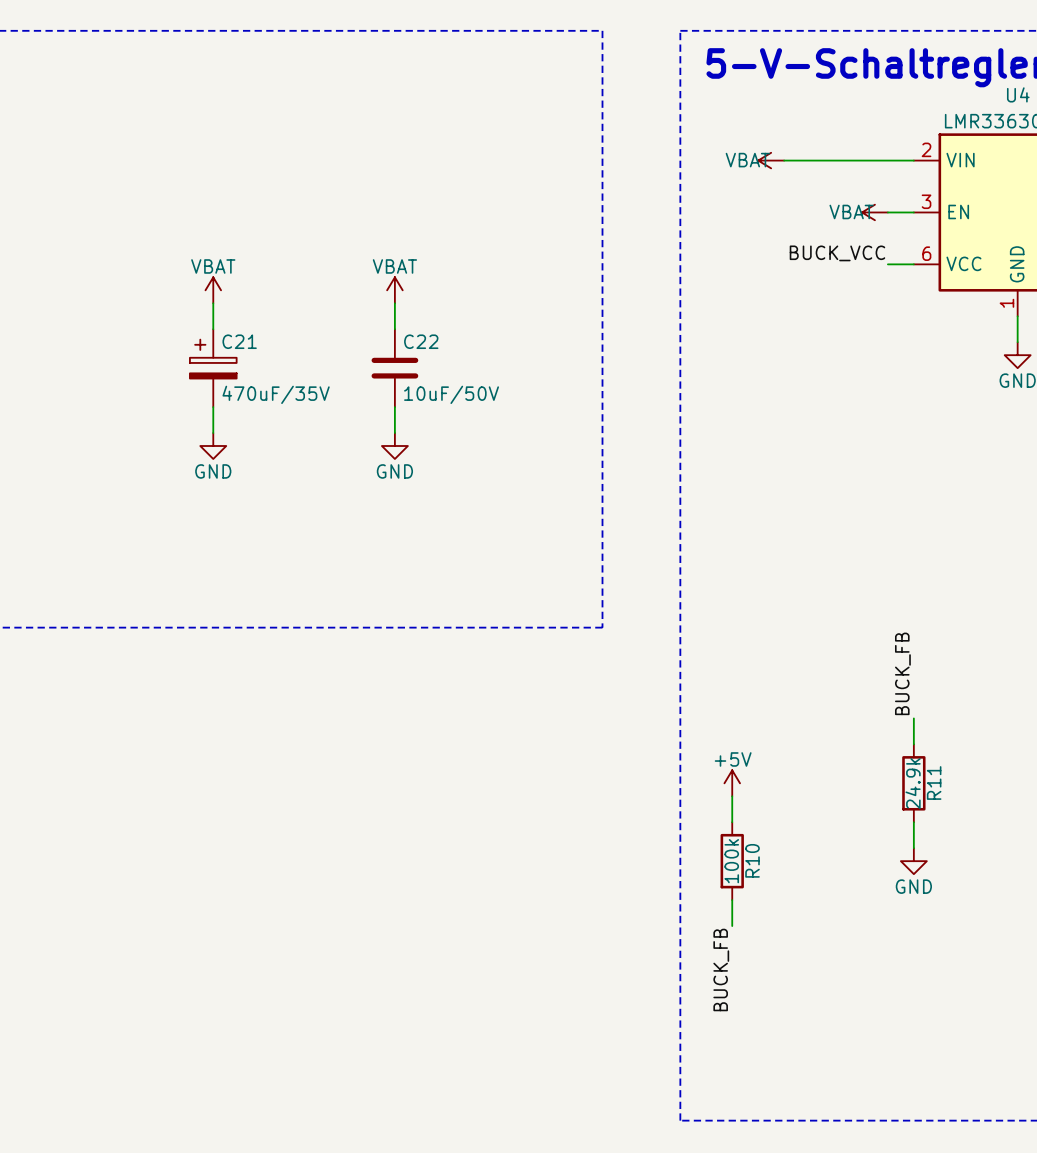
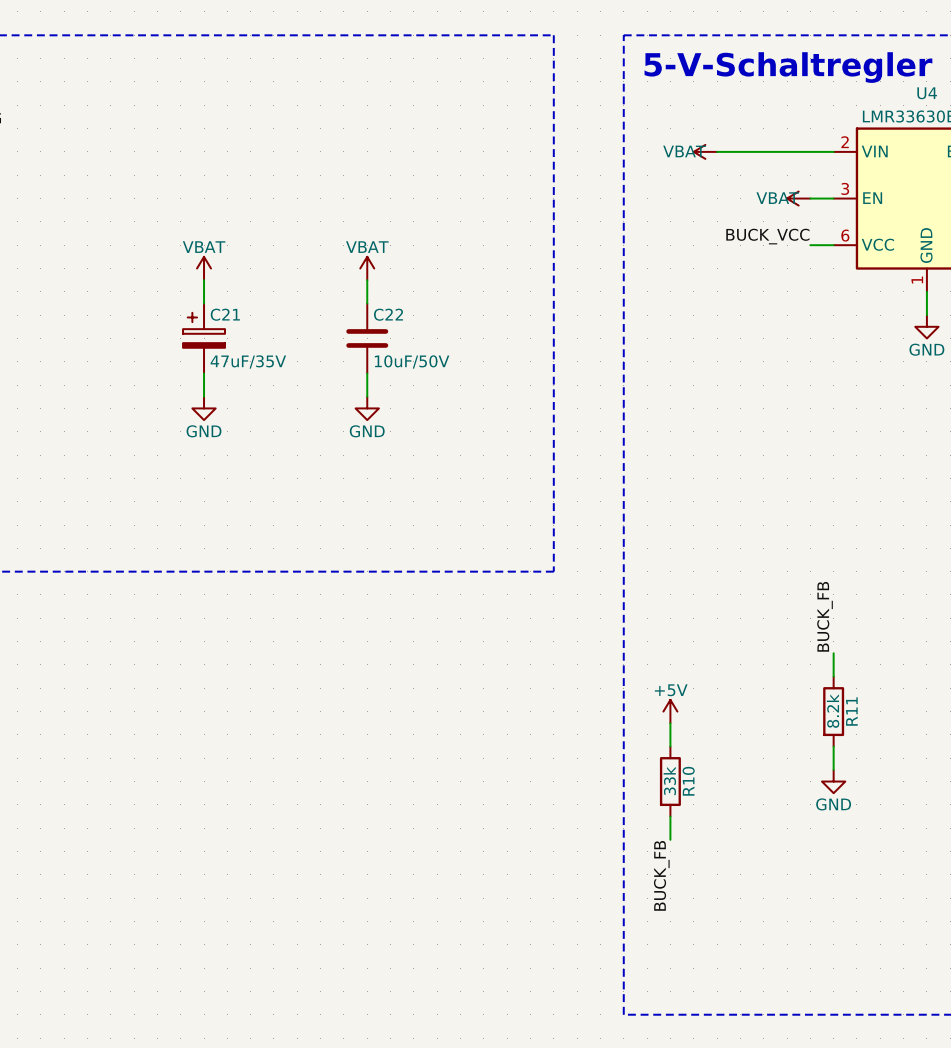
C21 value: 470uF/35V (276, 394) -> 47uF/35V (248, 361)
R11 value: 24.9k (913, 783) -> 8.2k (833, 711)
R10 value: 100k (731, 861) -> 33k (669, 780)

